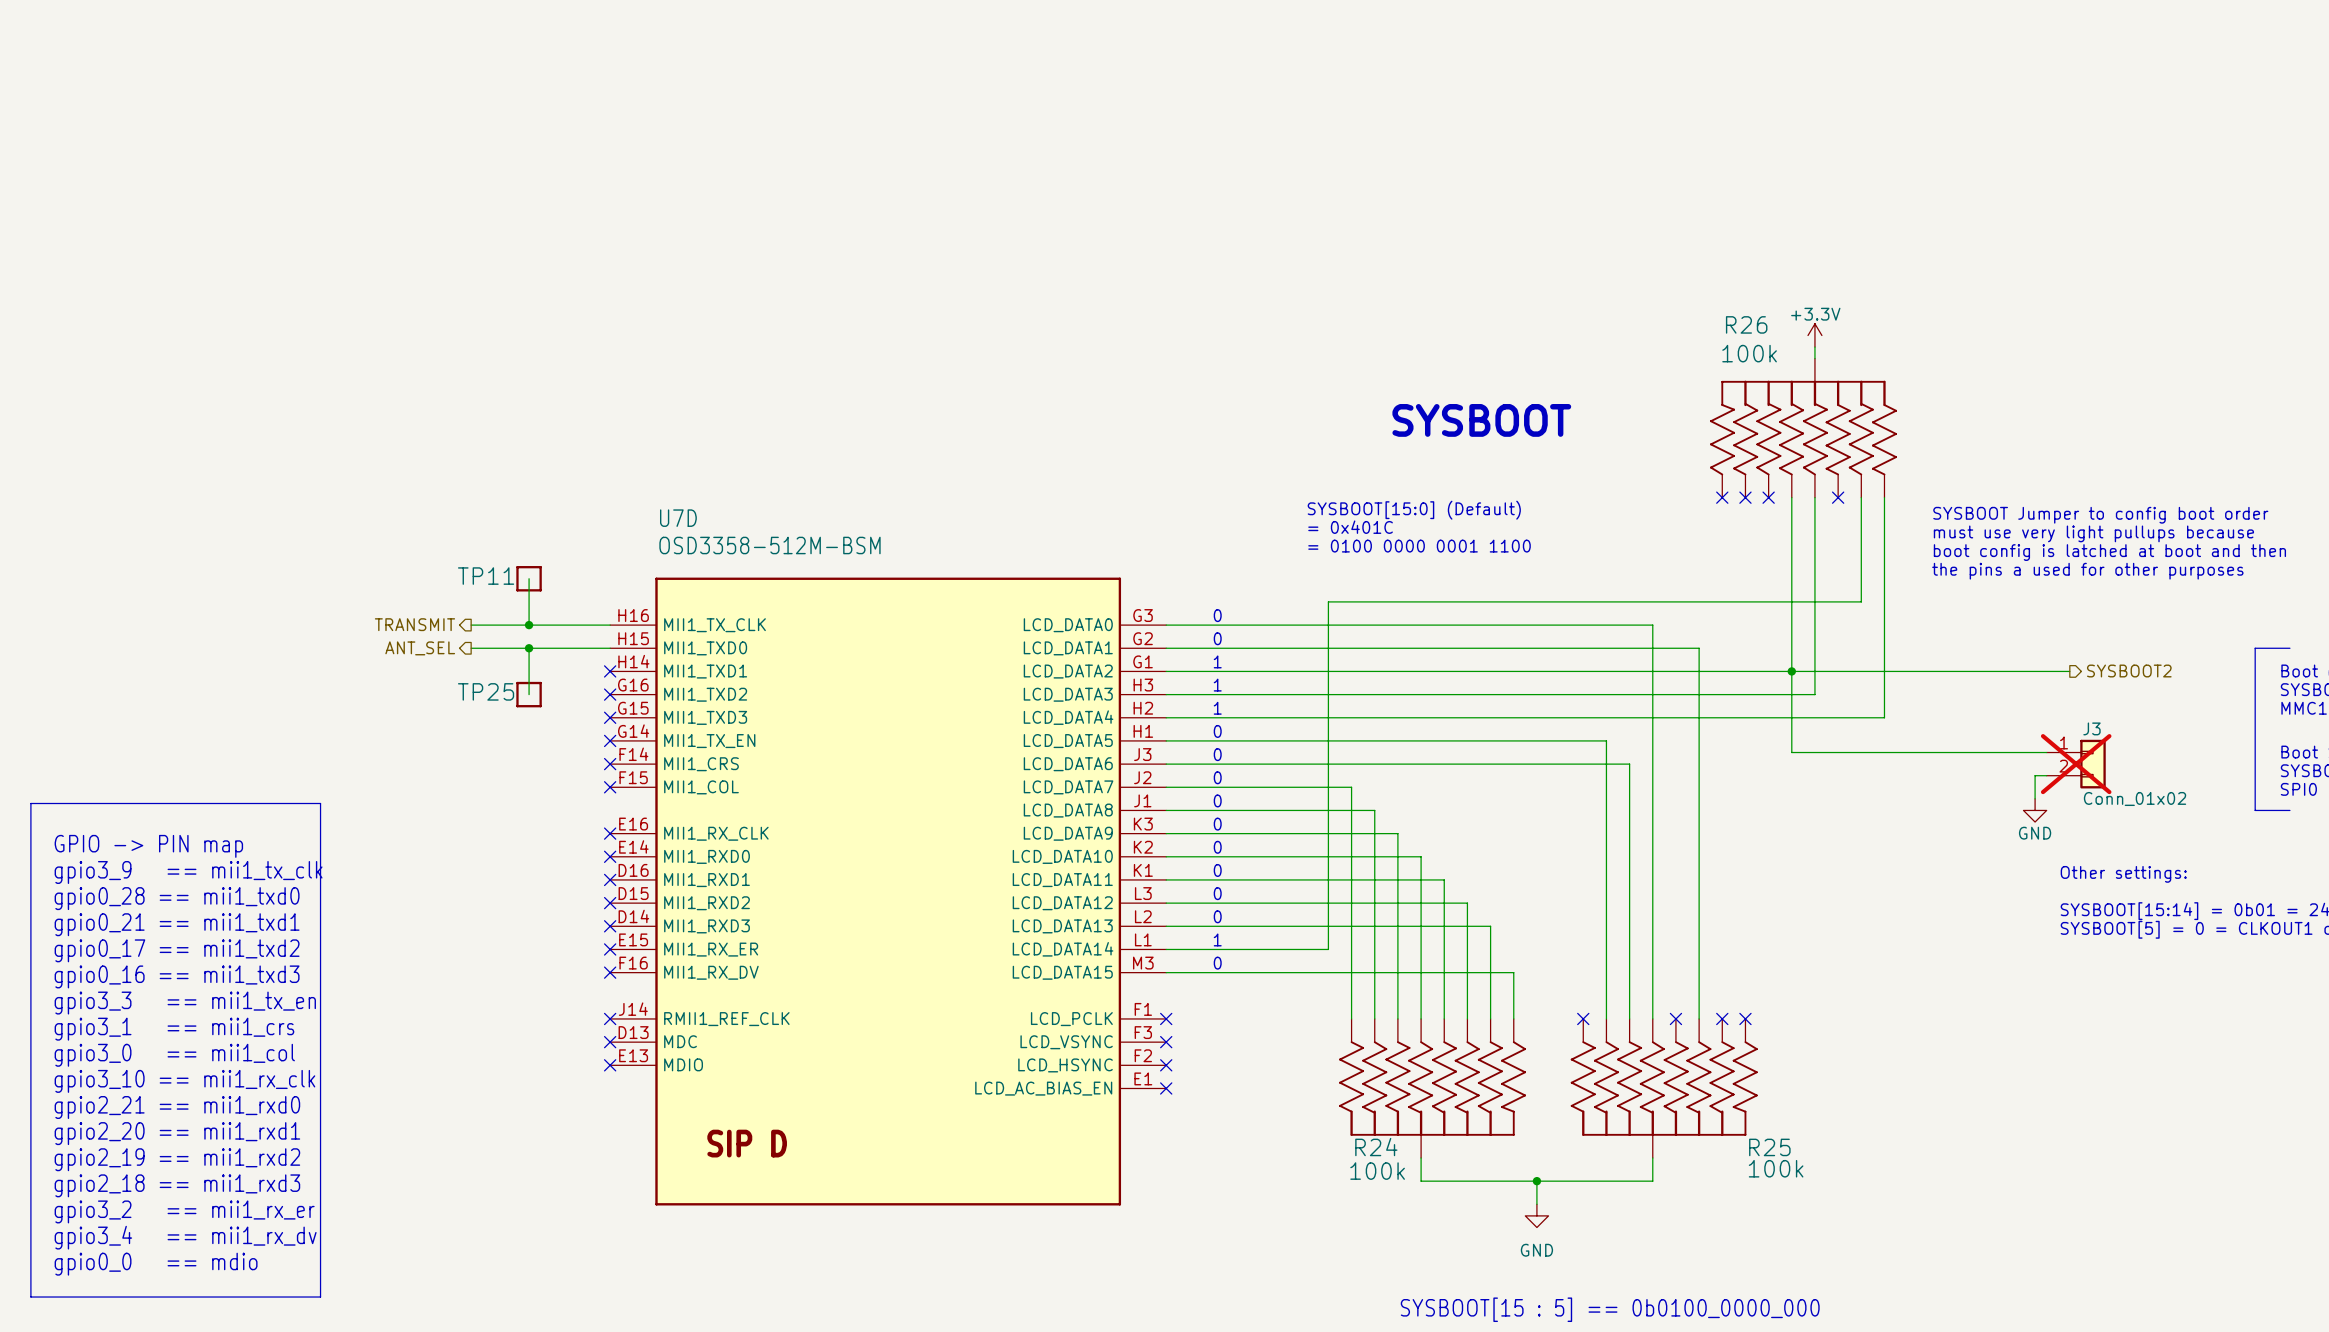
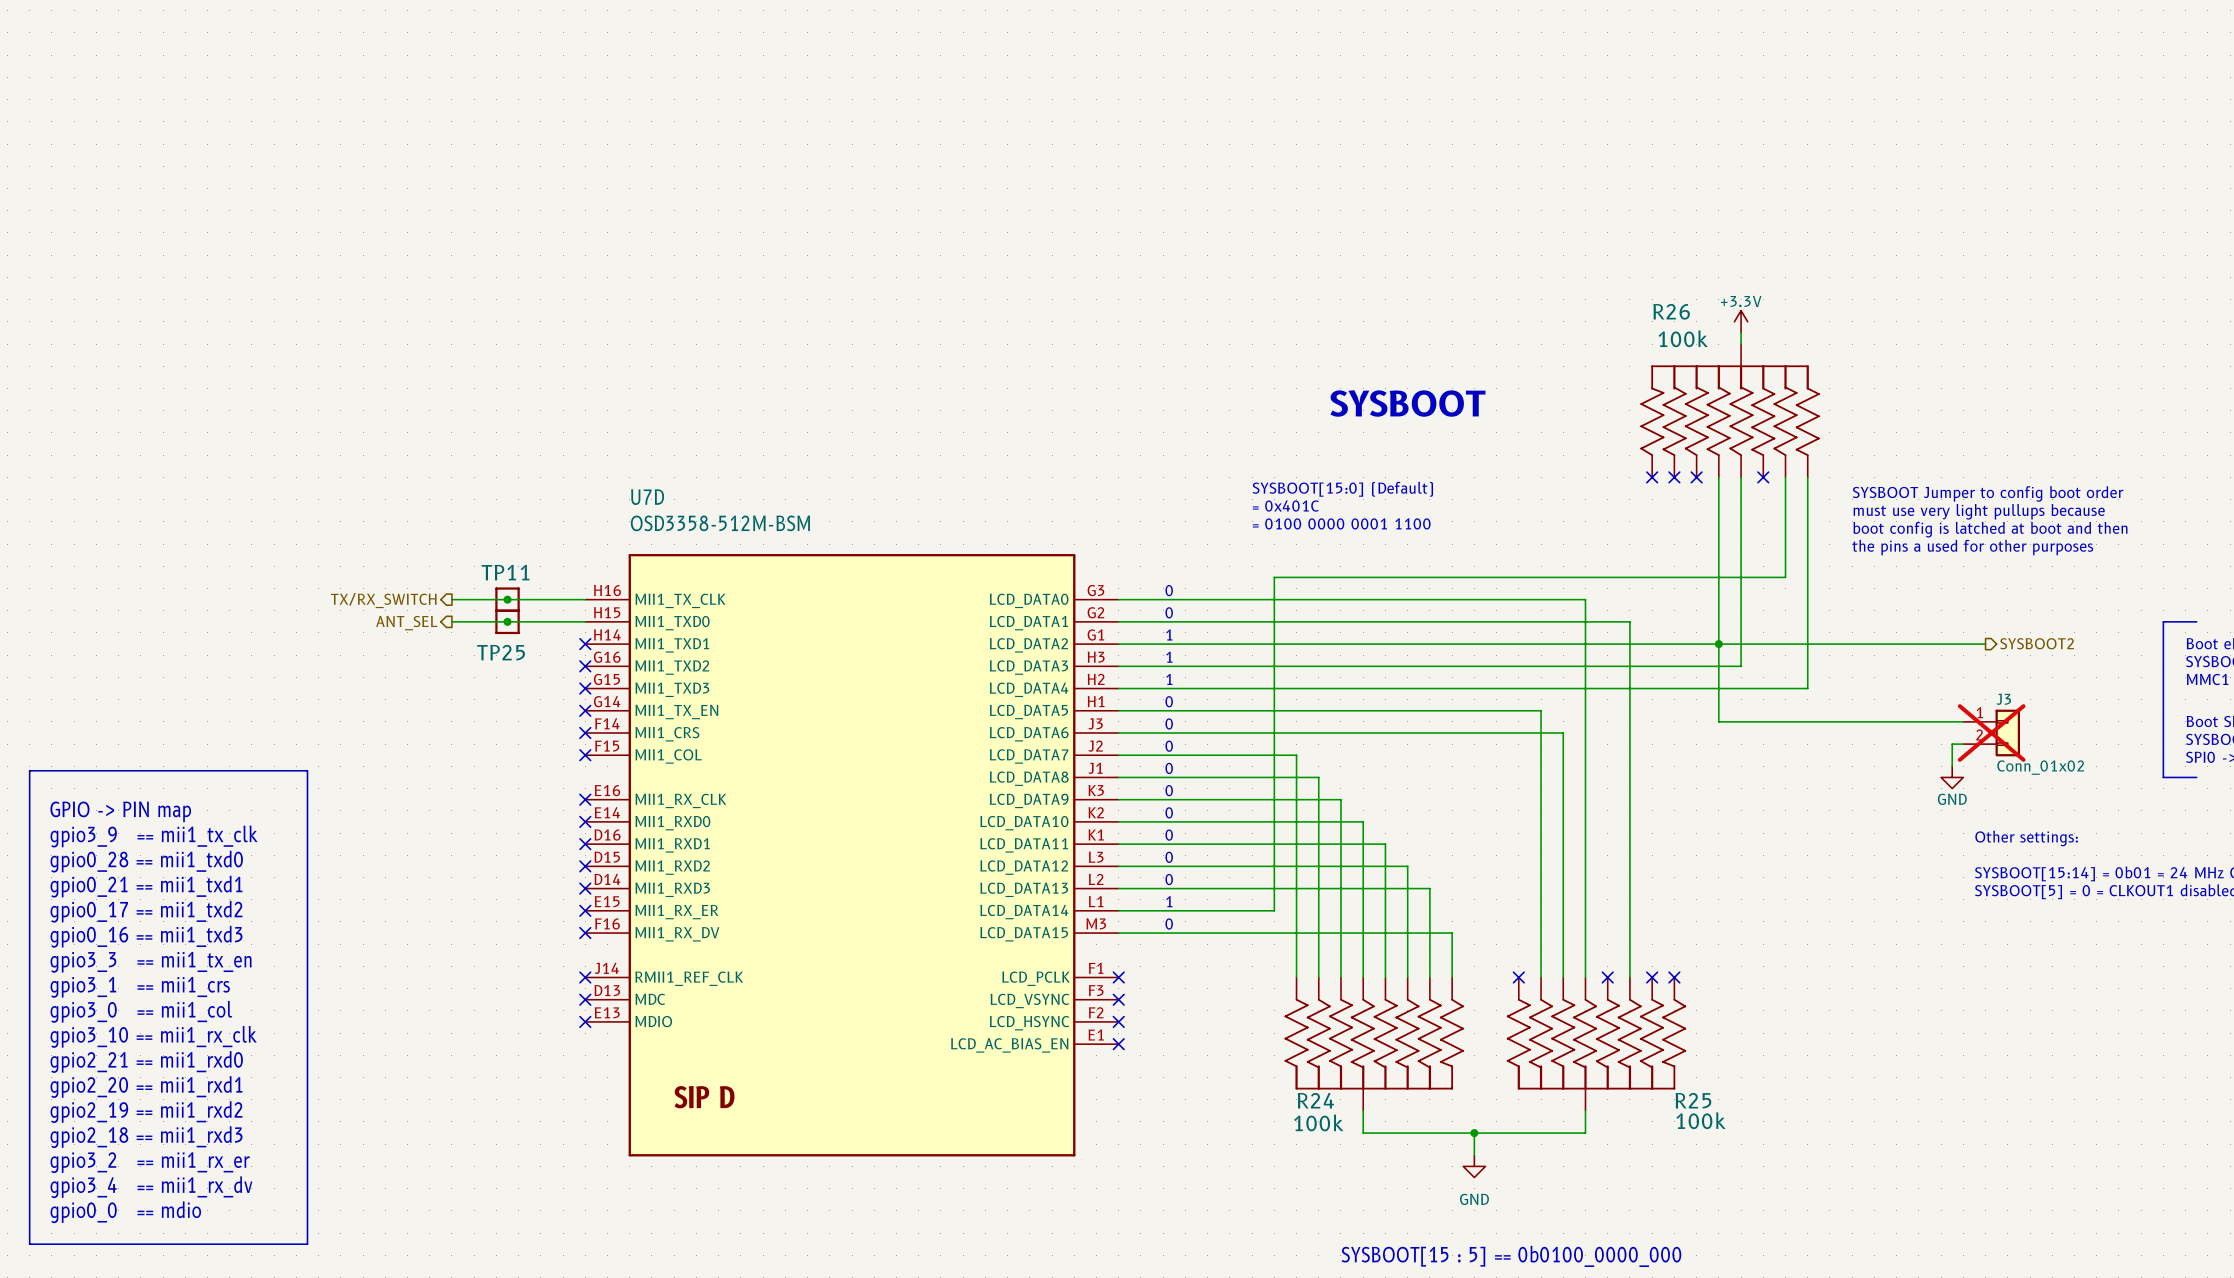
TP11 name position: TP11 (486, 576) -> TP11 (505, 572)
wire: (529, 578) (529, 625) -> none
TP11 position: (529, 578) -> (507, 599)
hierarchical label: TRANSMIT (414, 624) -> TX/RX_SWITCH (383, 600)
wire: (529, 648) (529, 694) -> none
TP25 name position: TP25 (486, 691) -> TP25 (501, 652)
TP25 position: (529, 694) -> (507, 621)

